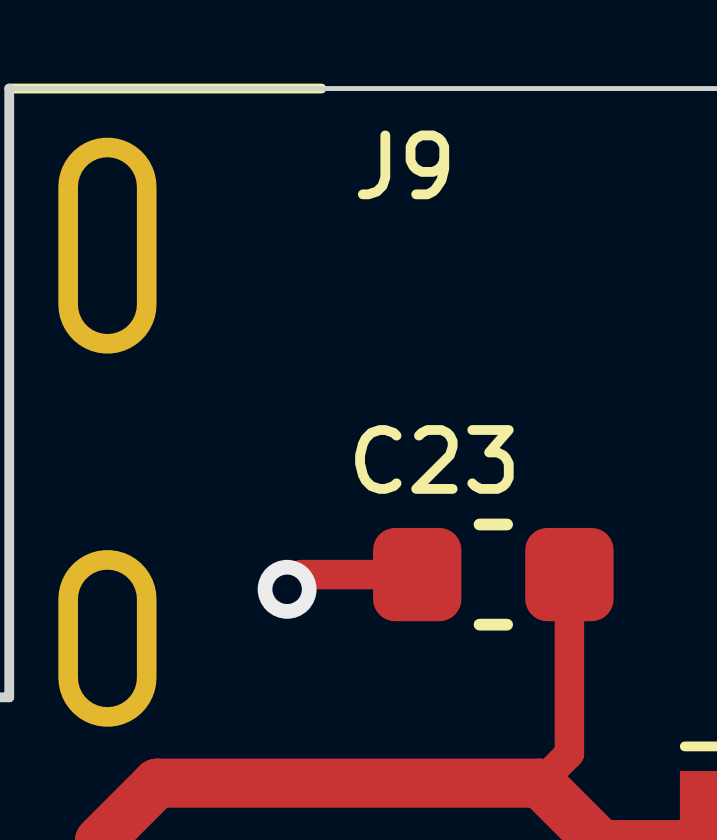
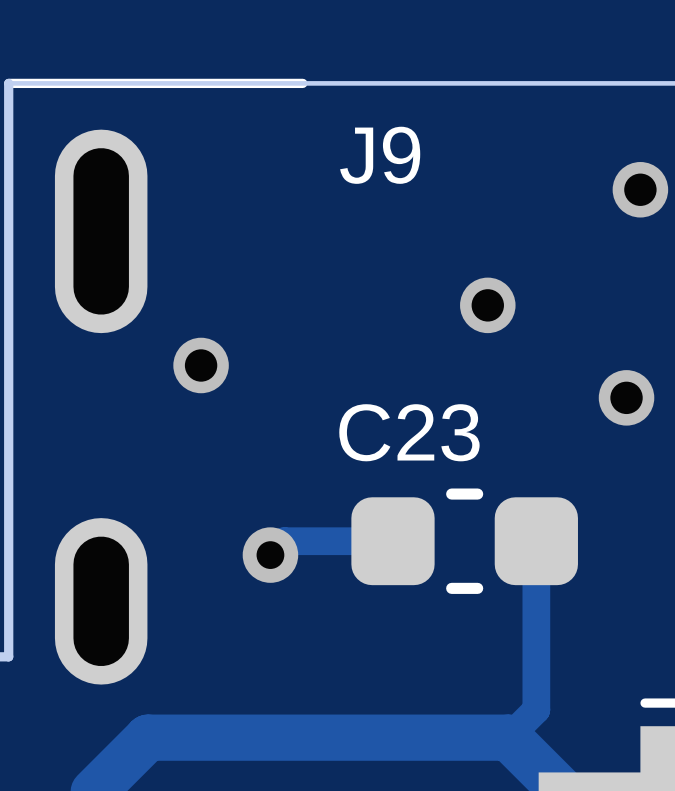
via: none -> (640, 189)
via: none -> (487, 305)
via: none -> (201, 365)
via: none -> (626, 397)

